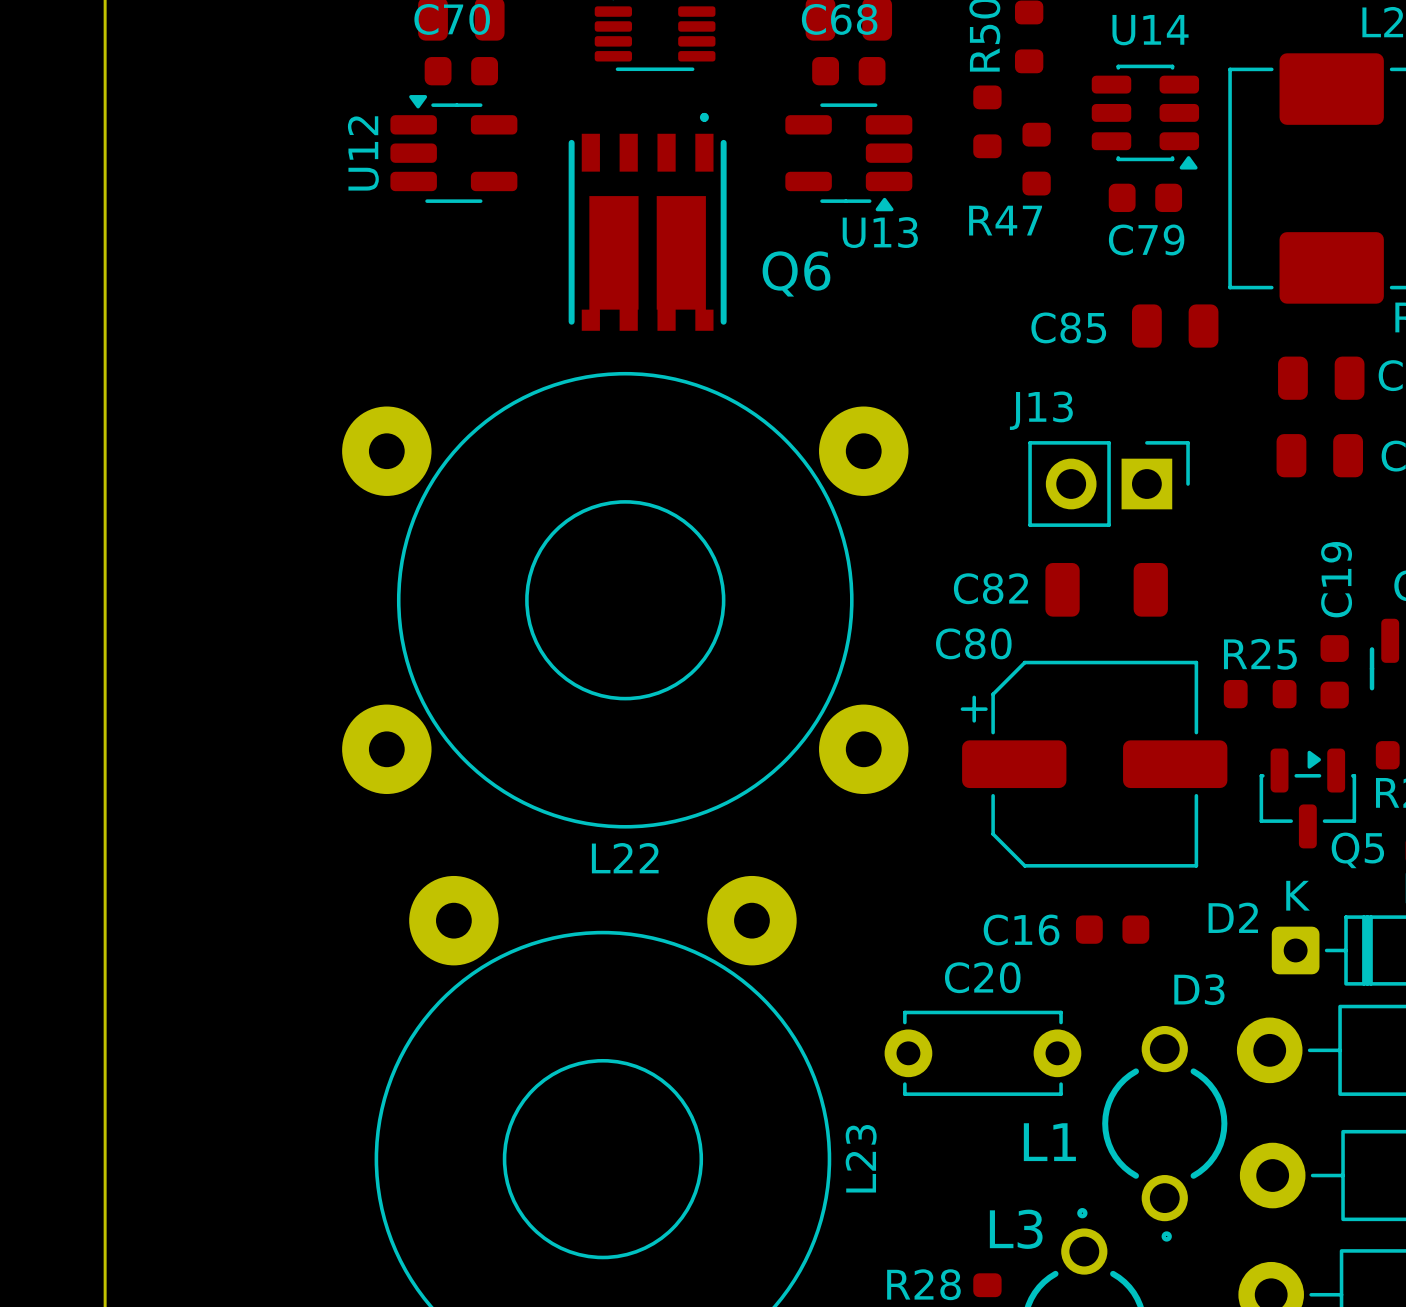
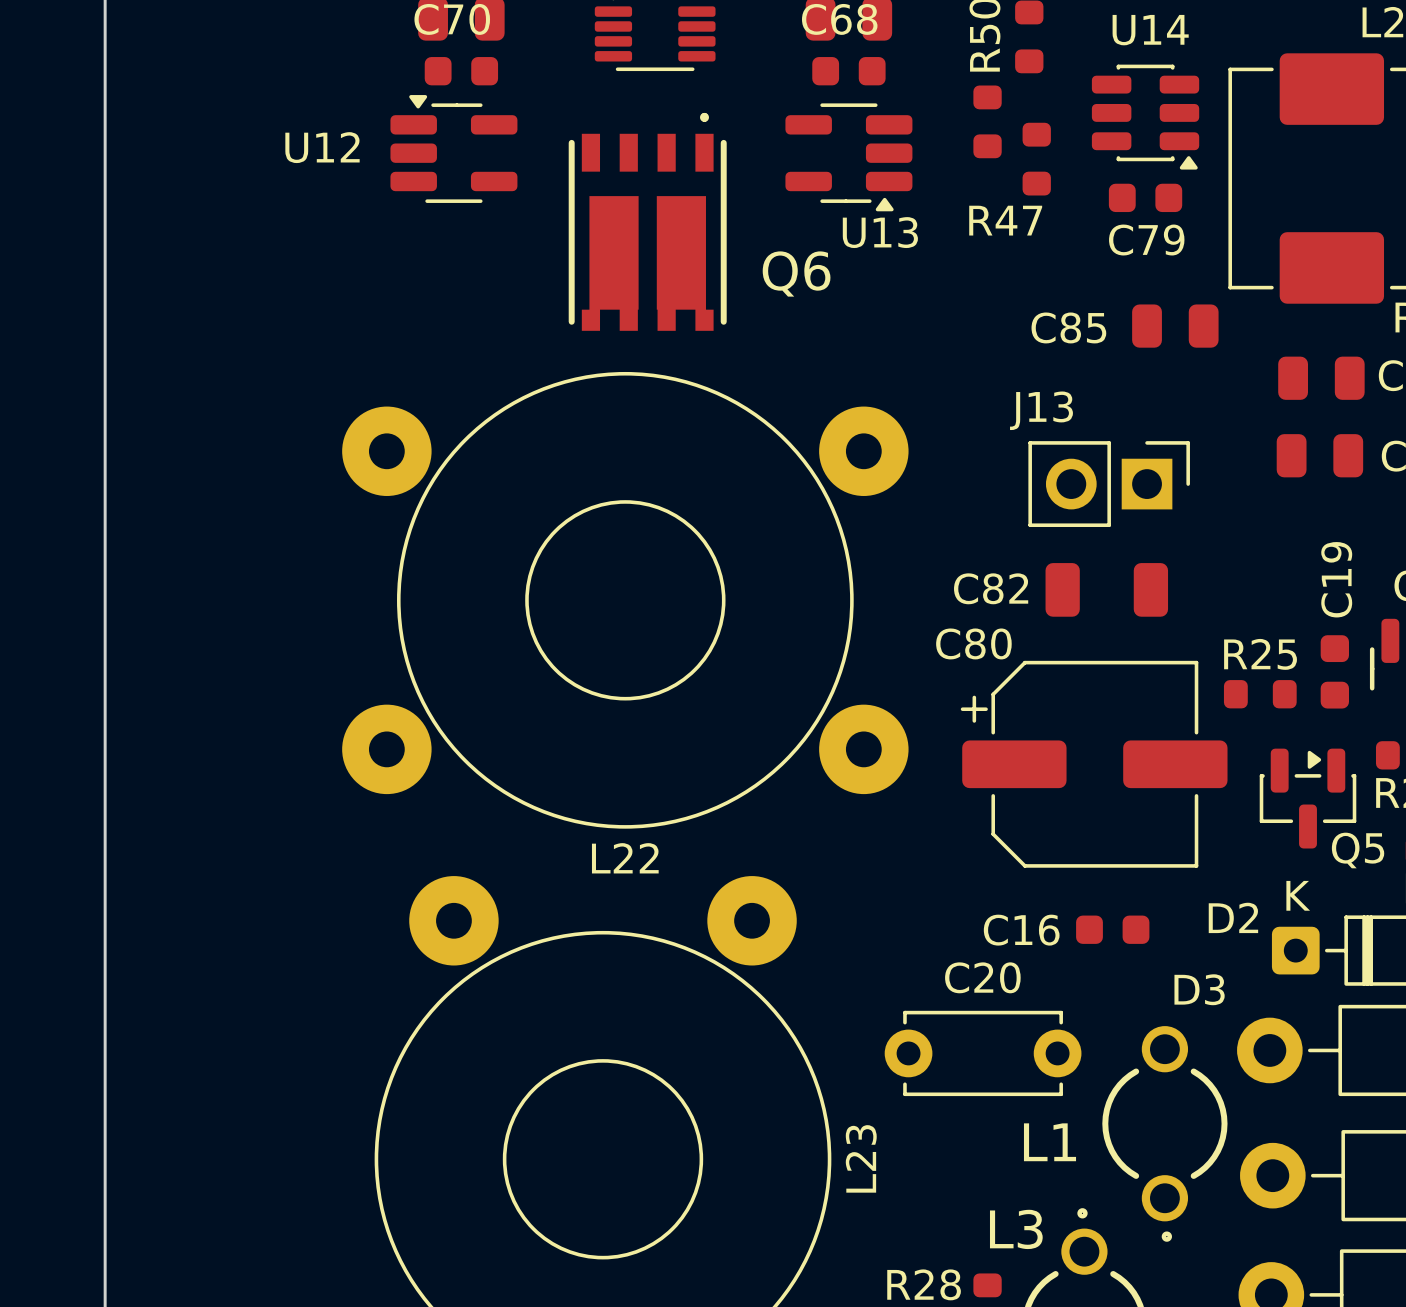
U12 name rotation: 0° (363, 153) -> 90° clockwise (322, 147)

